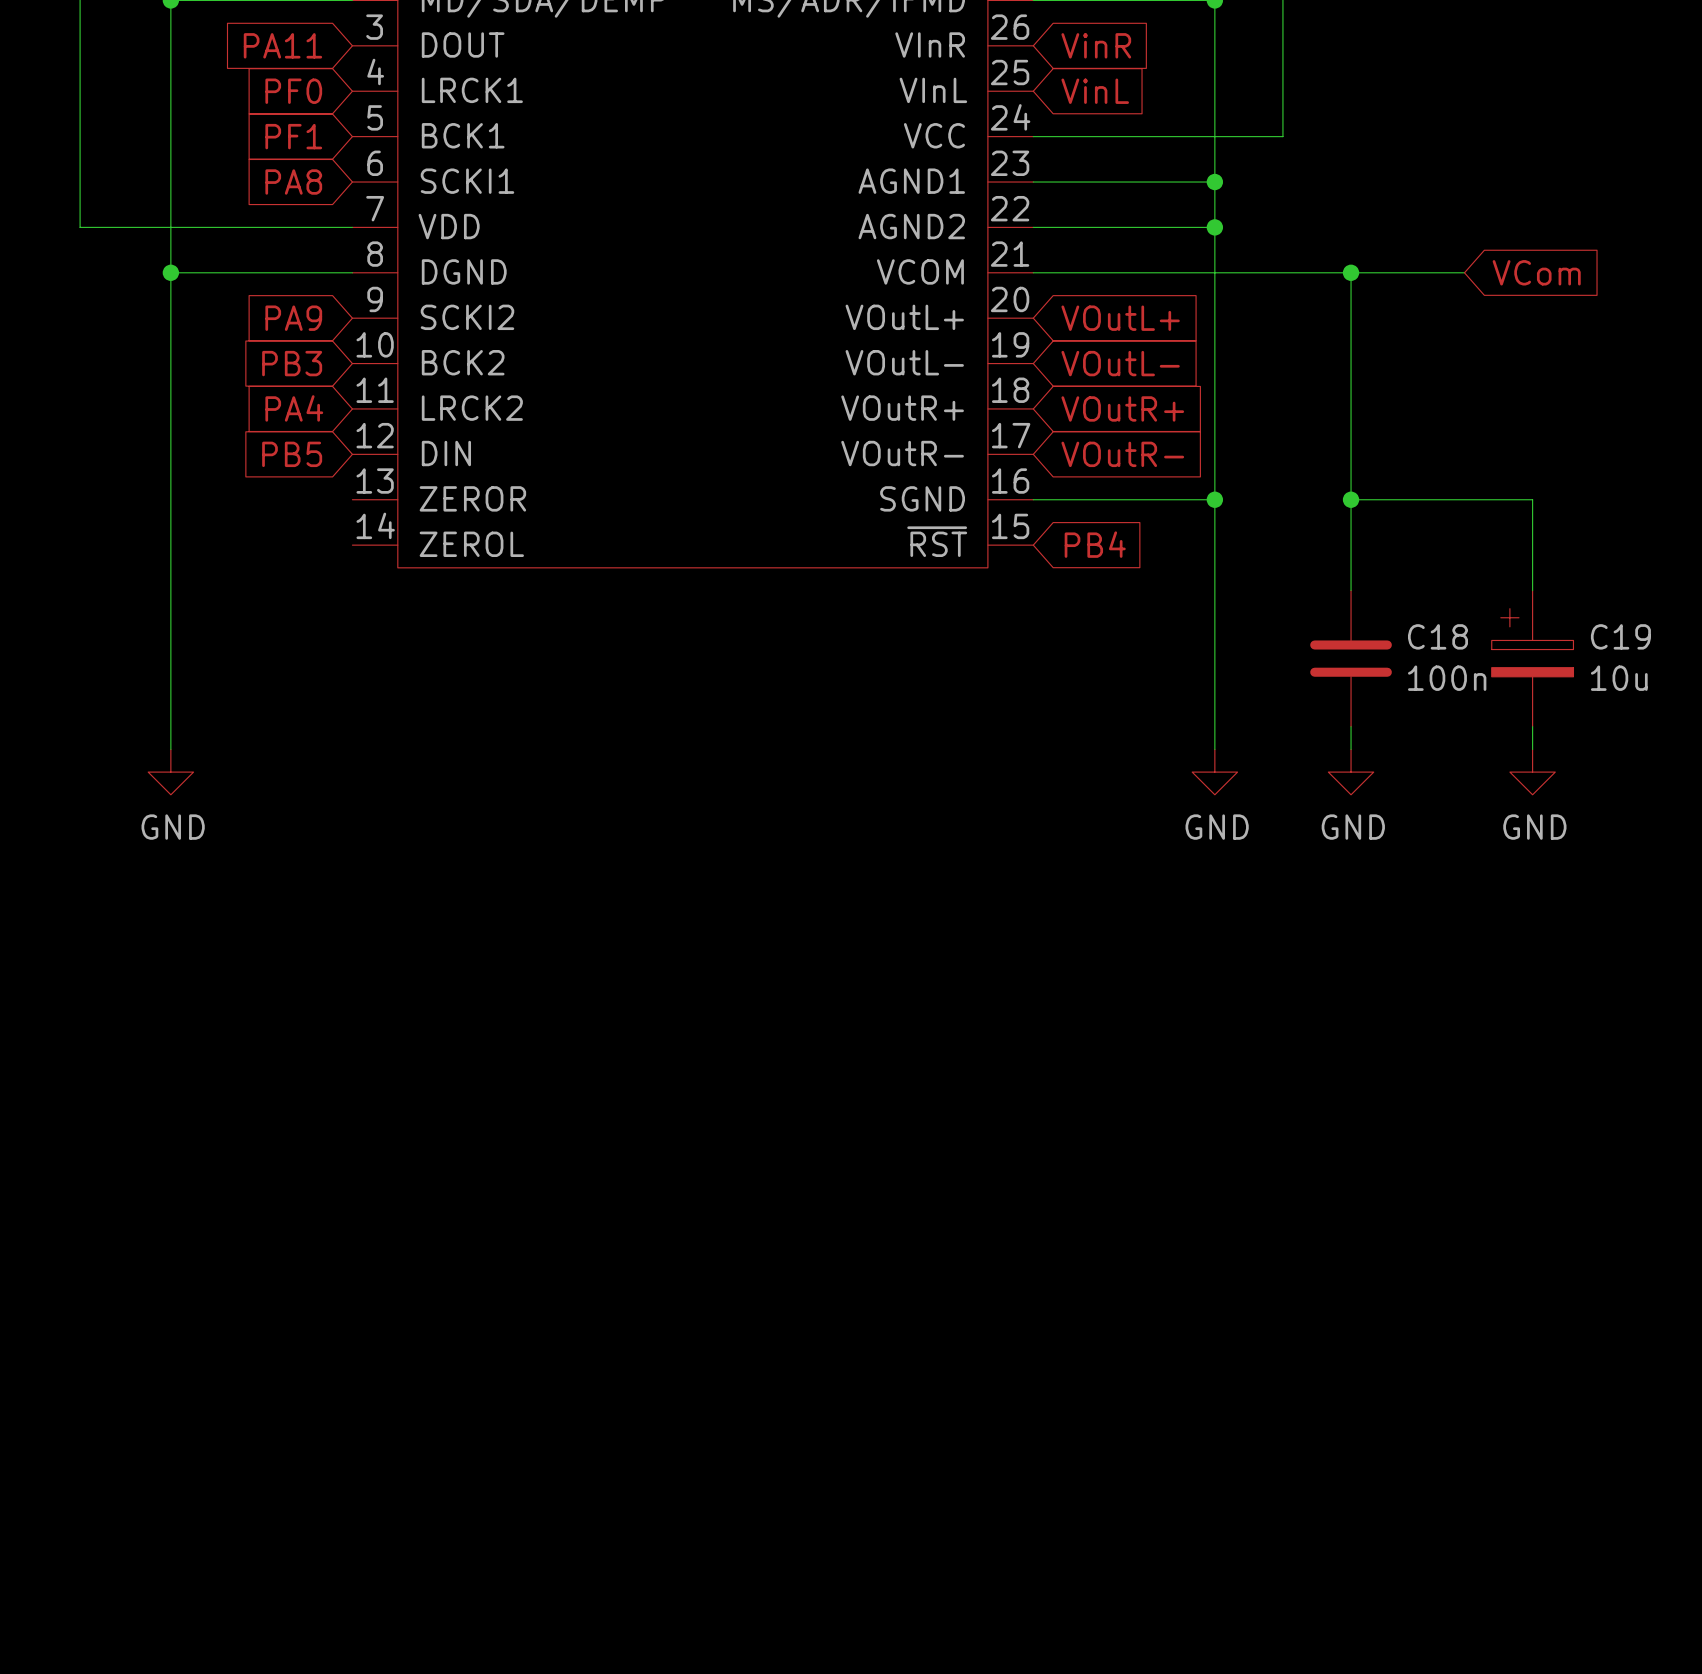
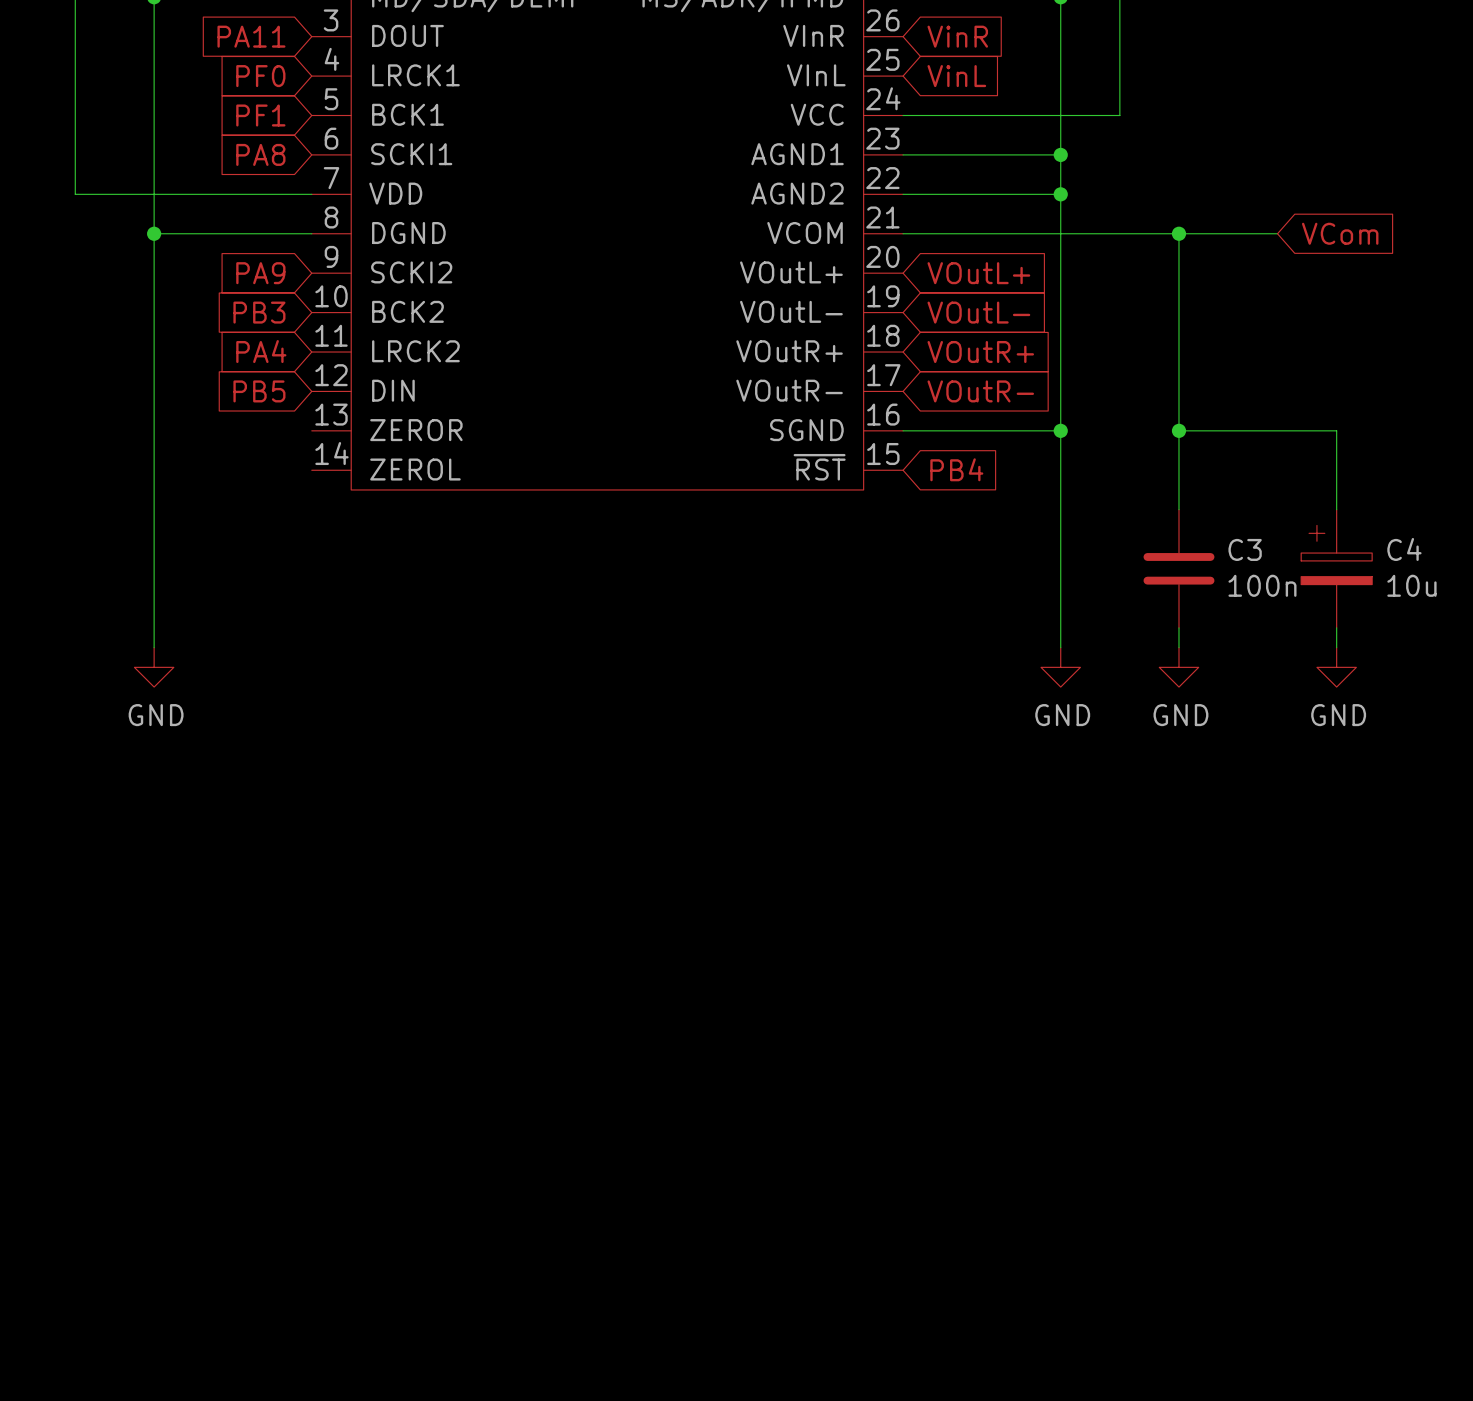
C18 name: C18 (1437, 636) -> C3 (1245, 549)
C19 name: C19 (1620, 636) -> C4 (1404, 549)

